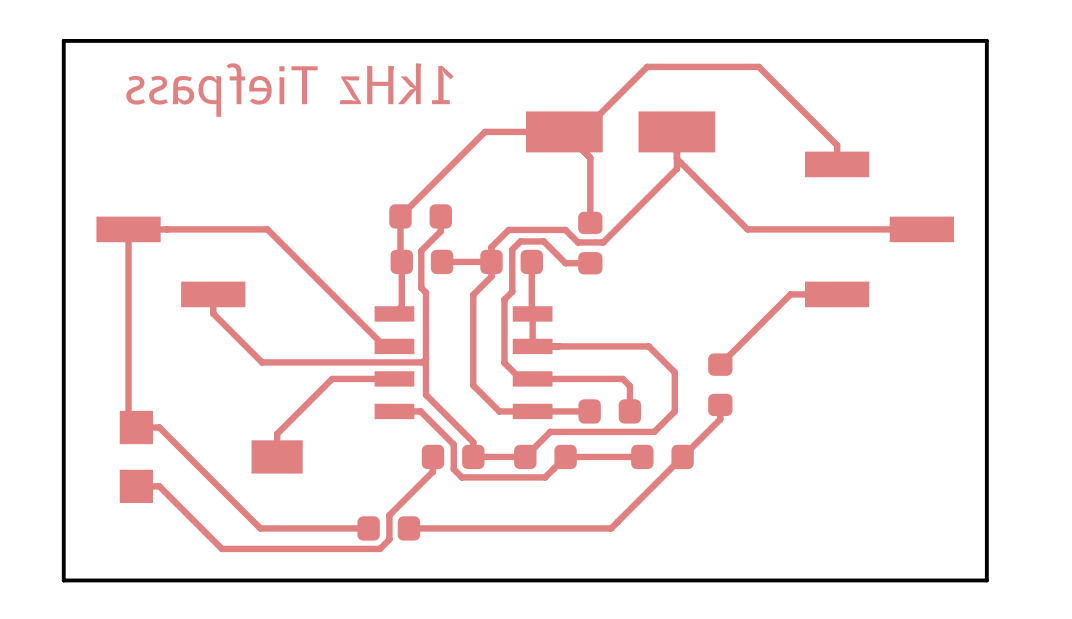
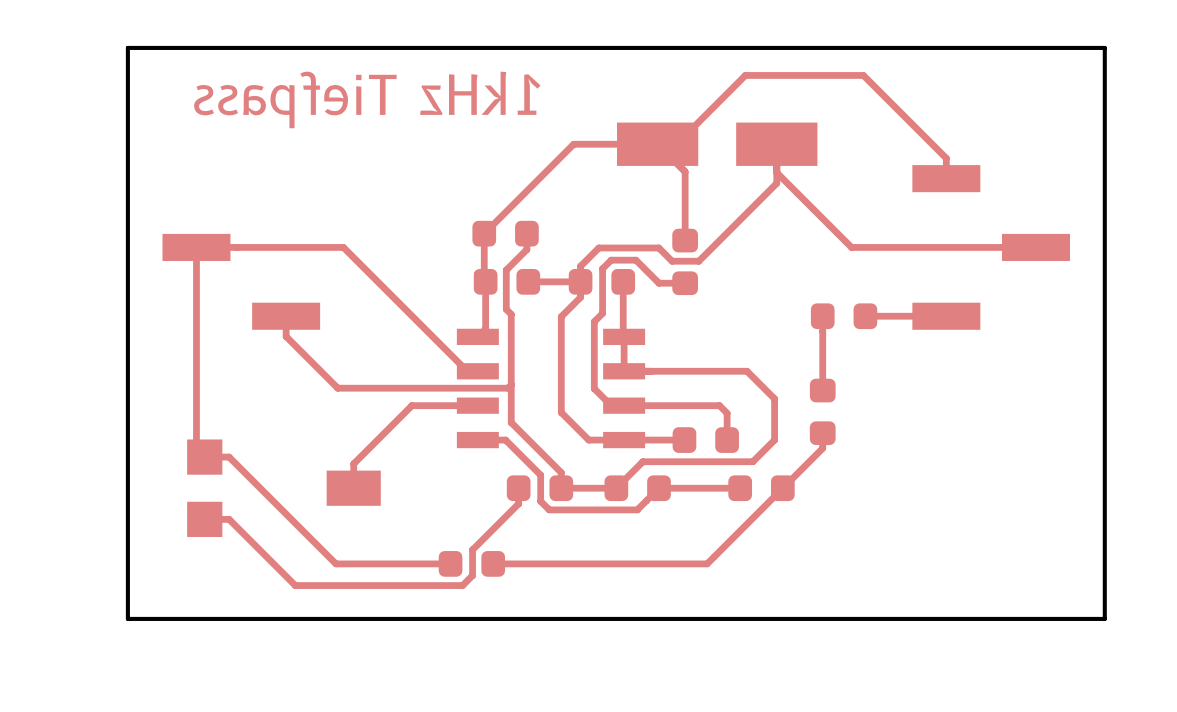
part: none -> (844, 316)
top track: (790, 294) (720, 364) -> (822, 316) (822, 390)
top track: none -> (897, 316) (865, 316)

